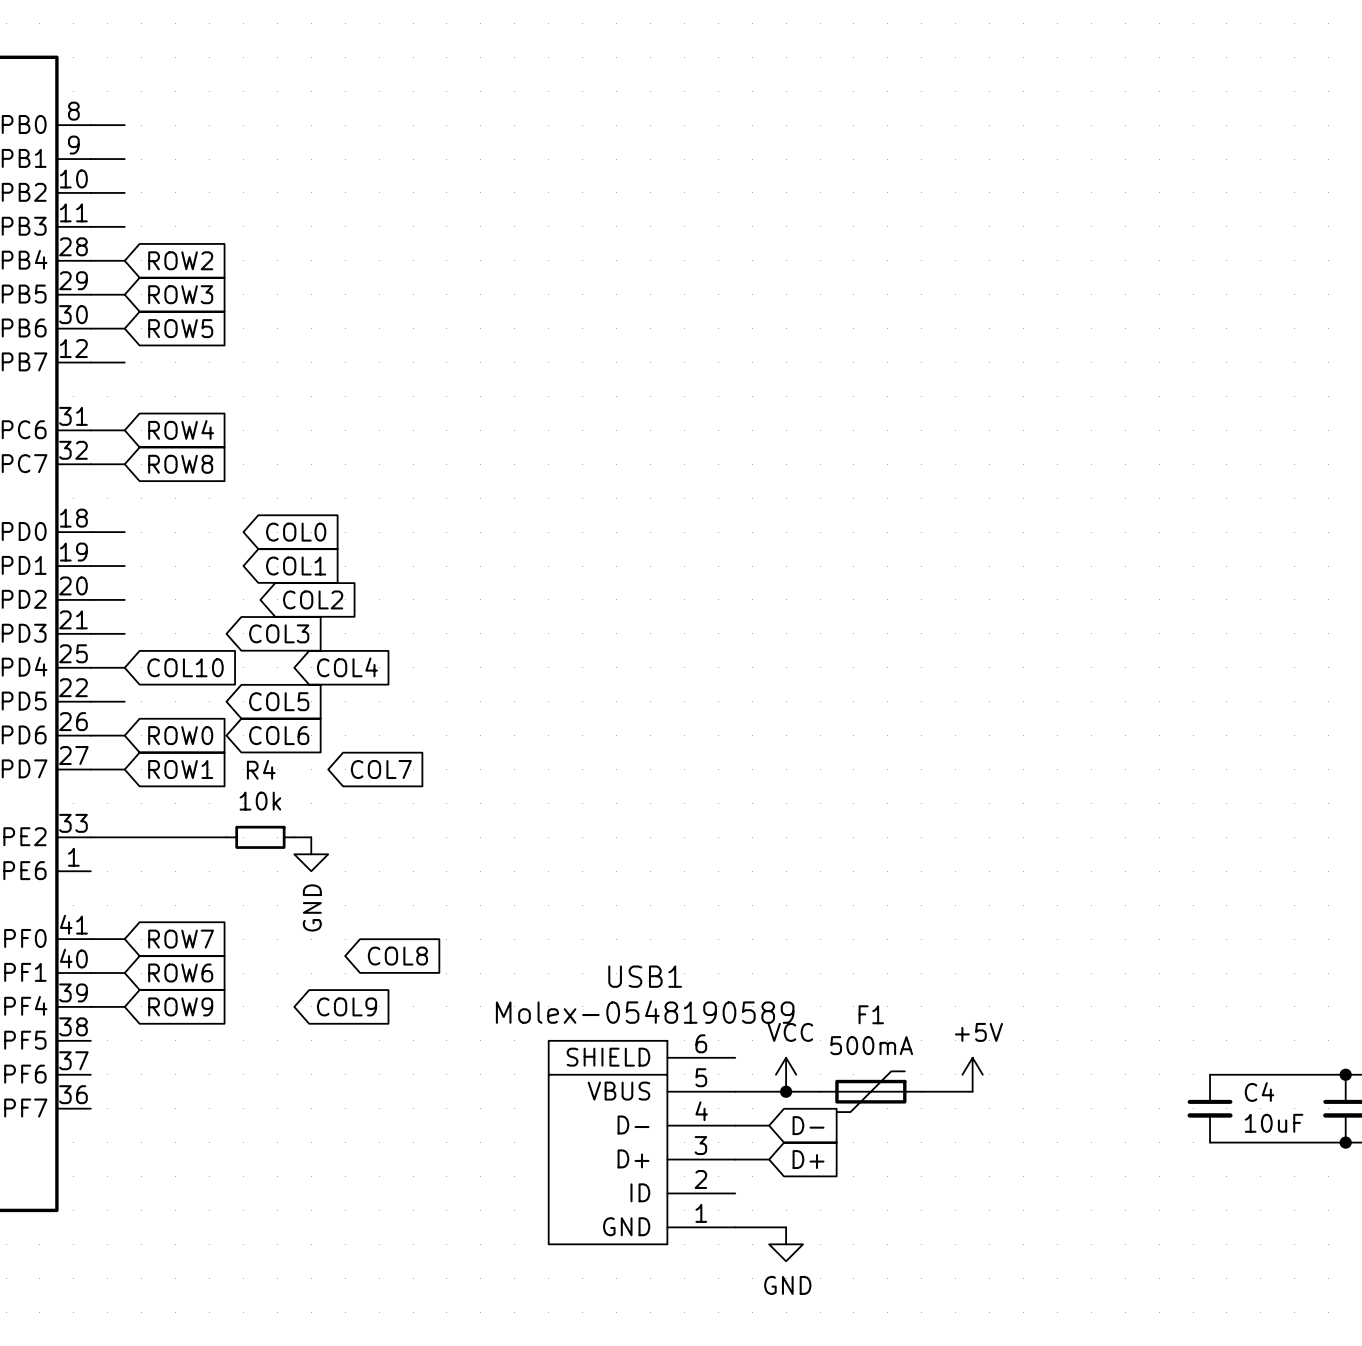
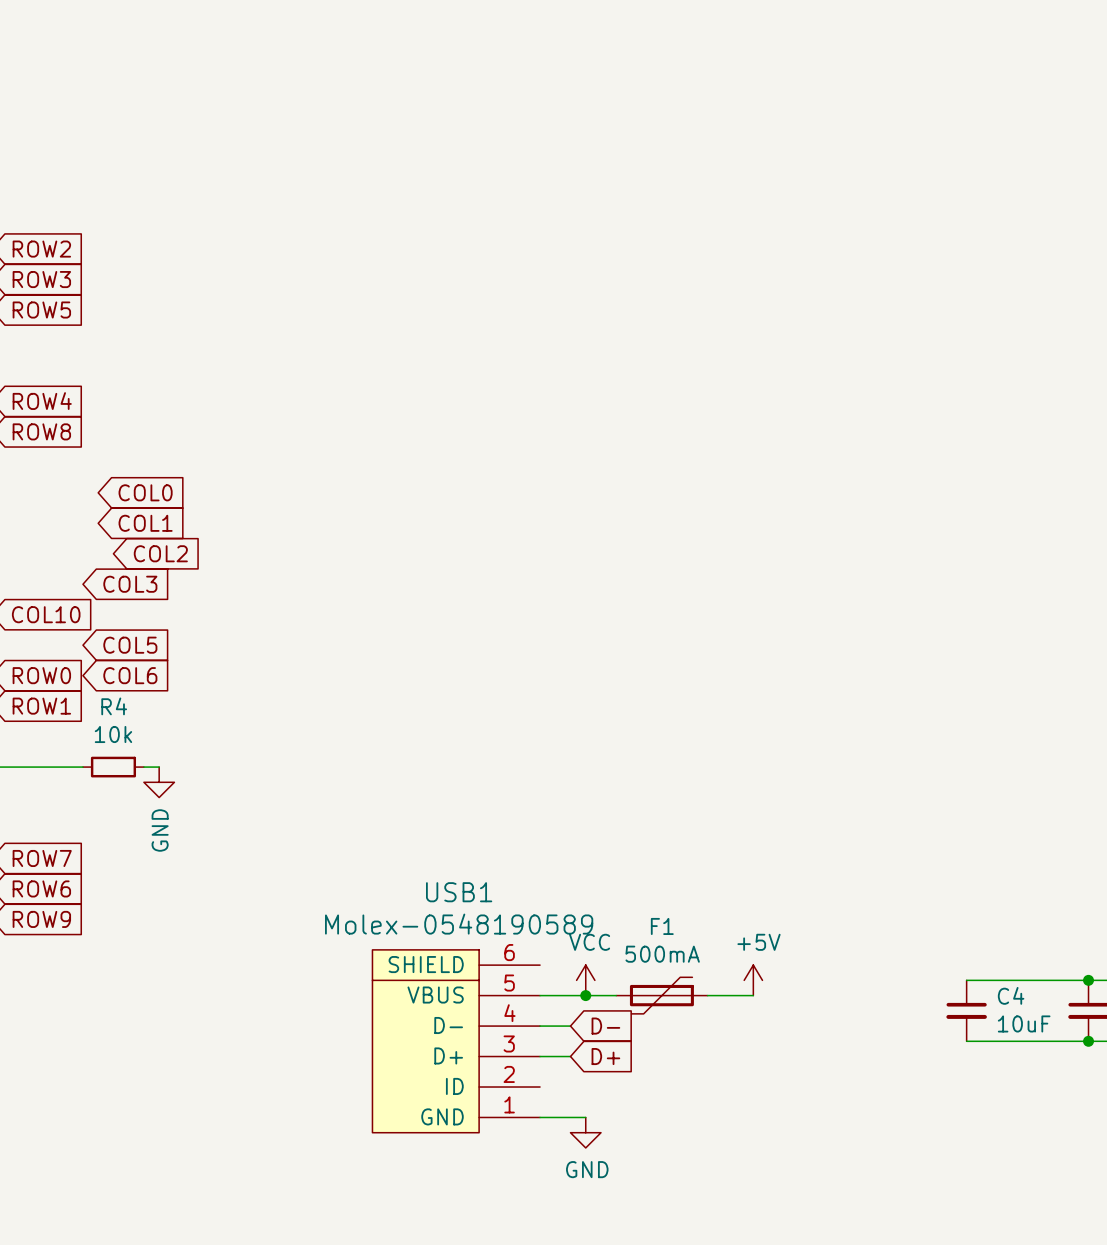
global label: COL4 (347, 667) -> none
global label: COL7 (381, 769) -> none
global label: COL8 (397, 956) -> none
global label: COL9 (347, 1006) -> none

